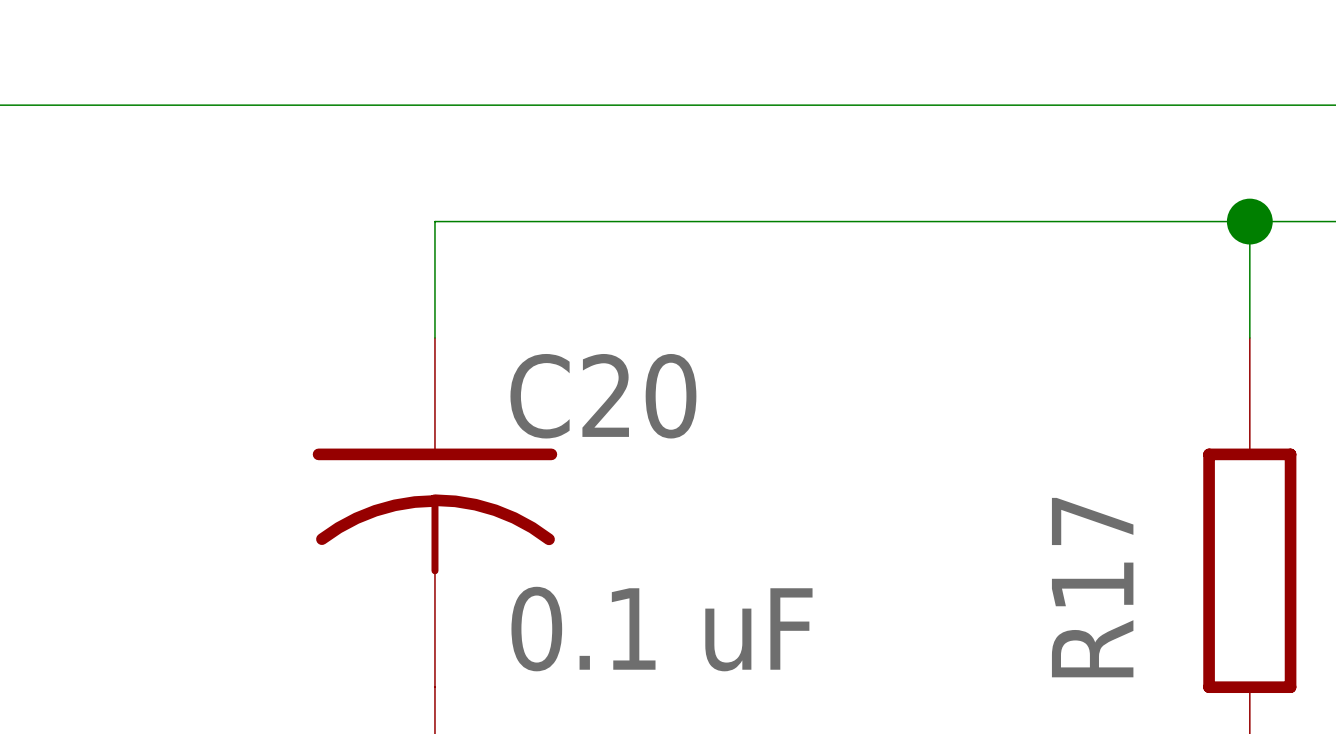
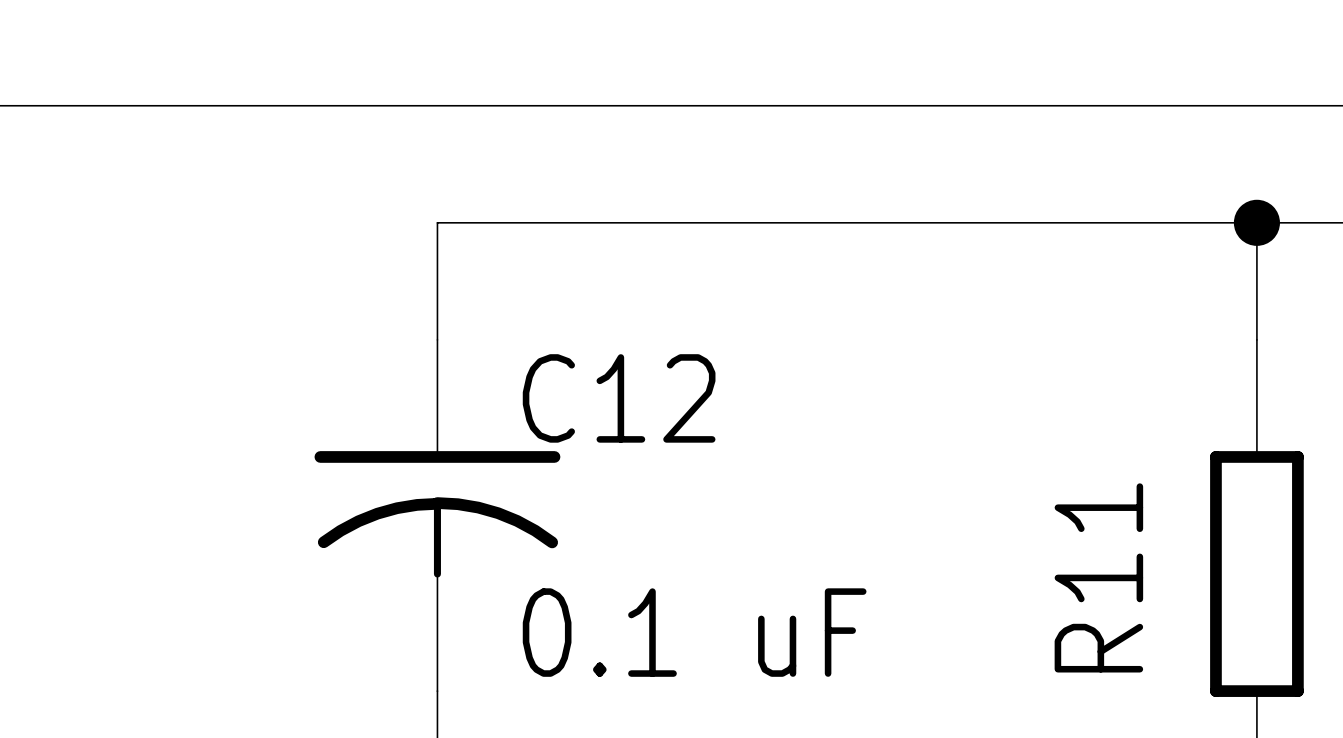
C20 name: C20 (603, 396) -> C12 (619, 398)
R17 name: R17 (1092, 587) -> R11 (1098, 577)

